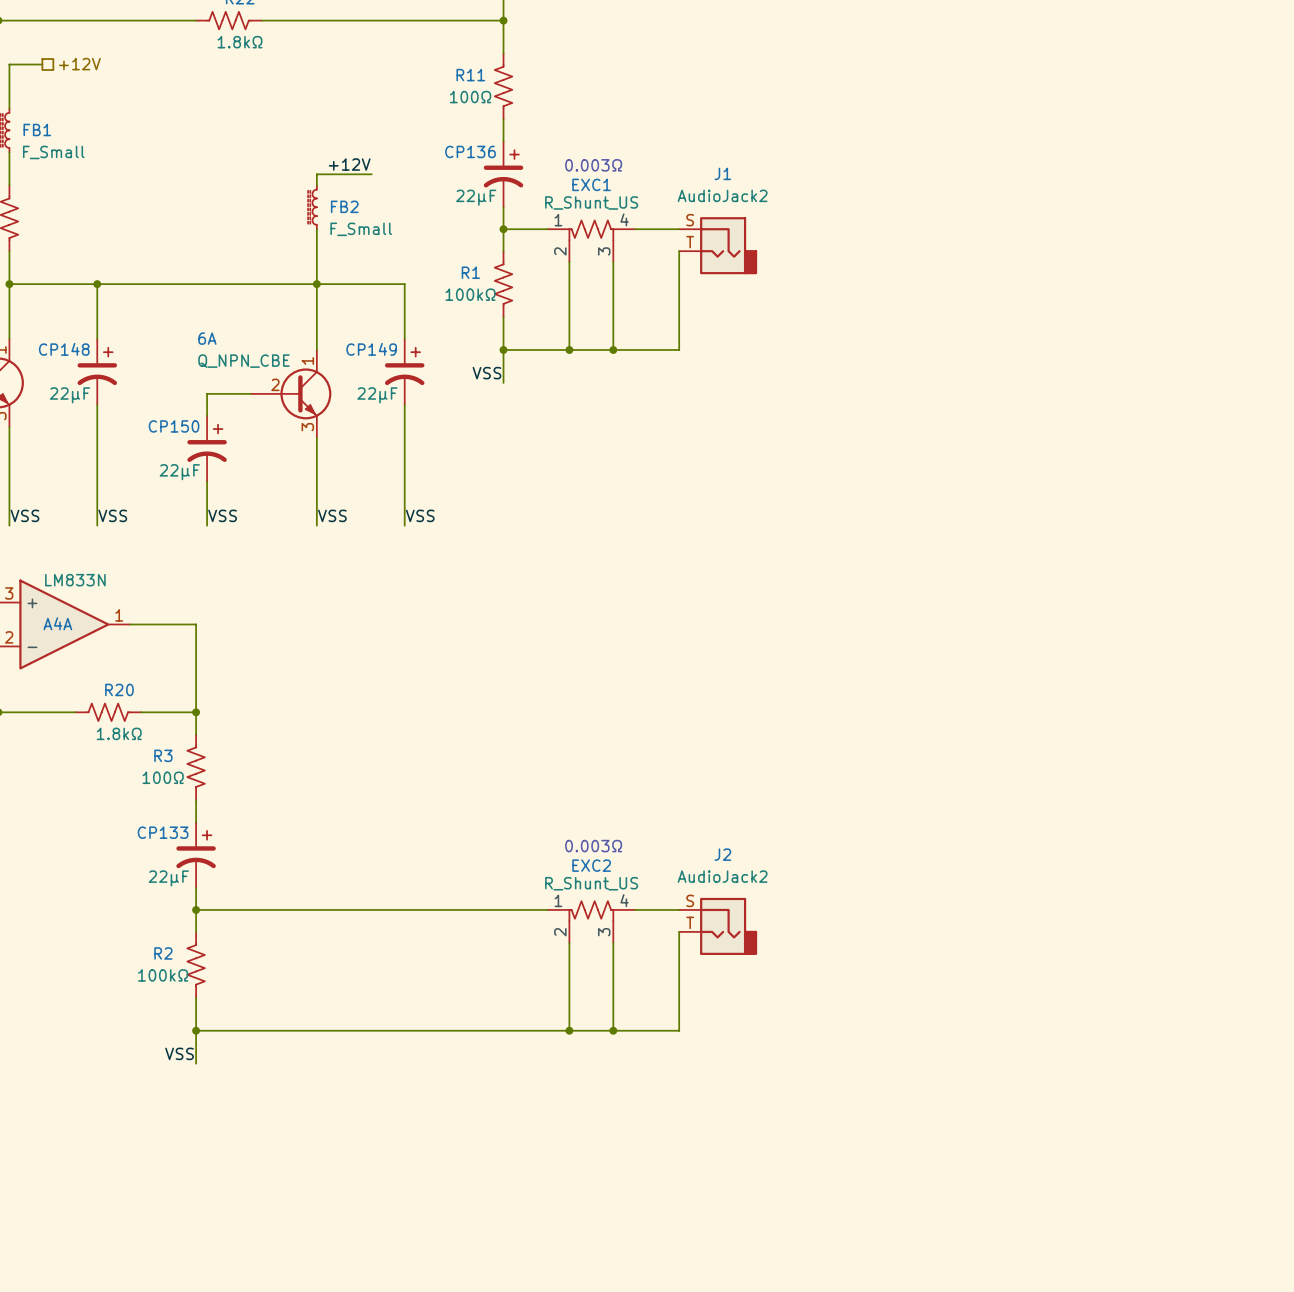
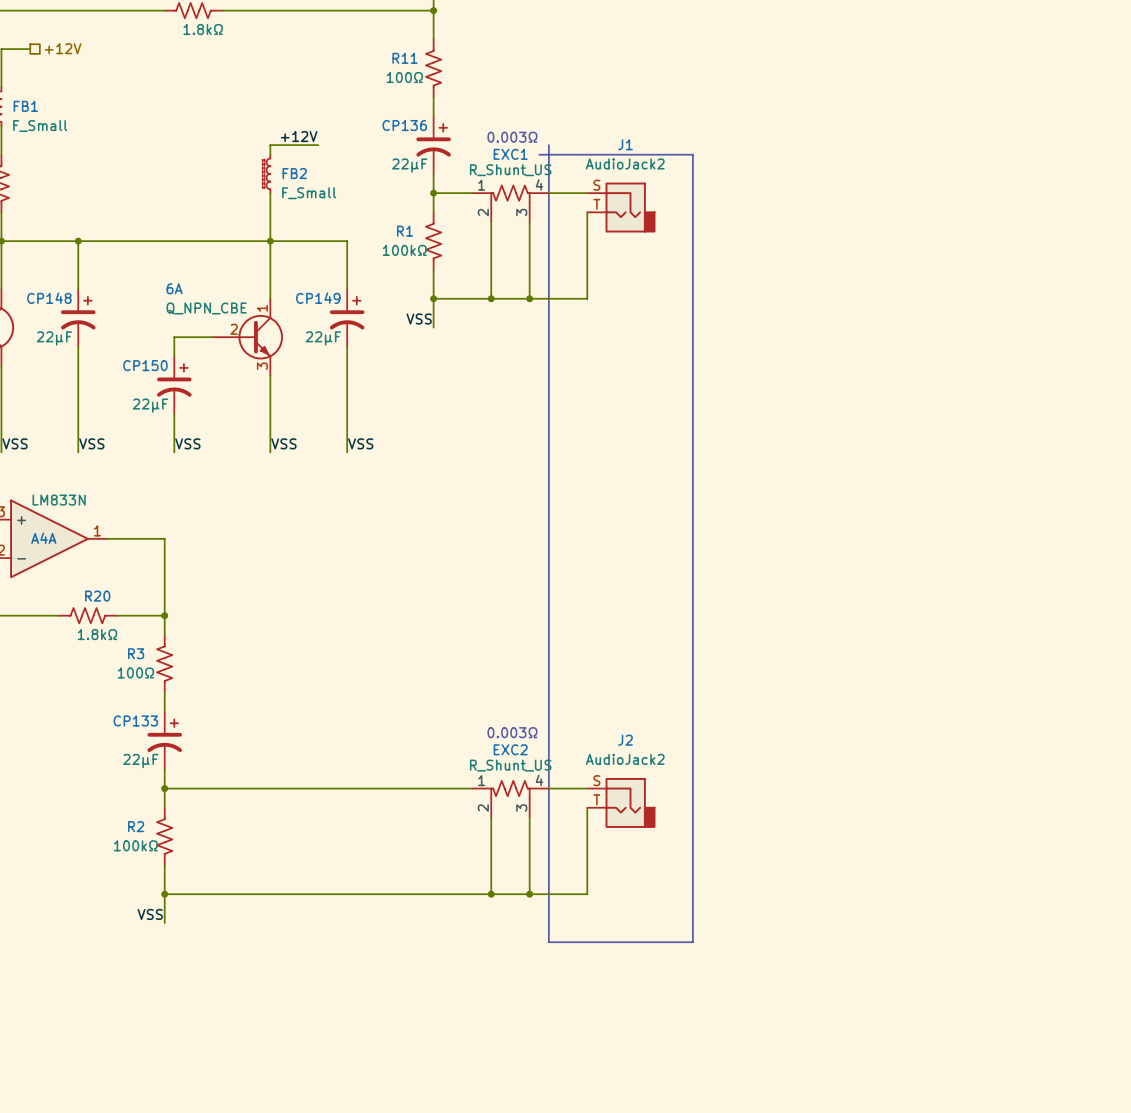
line: none -> (548, 145) (548, 942) (692, 942) (692, 154) (539, 154)

